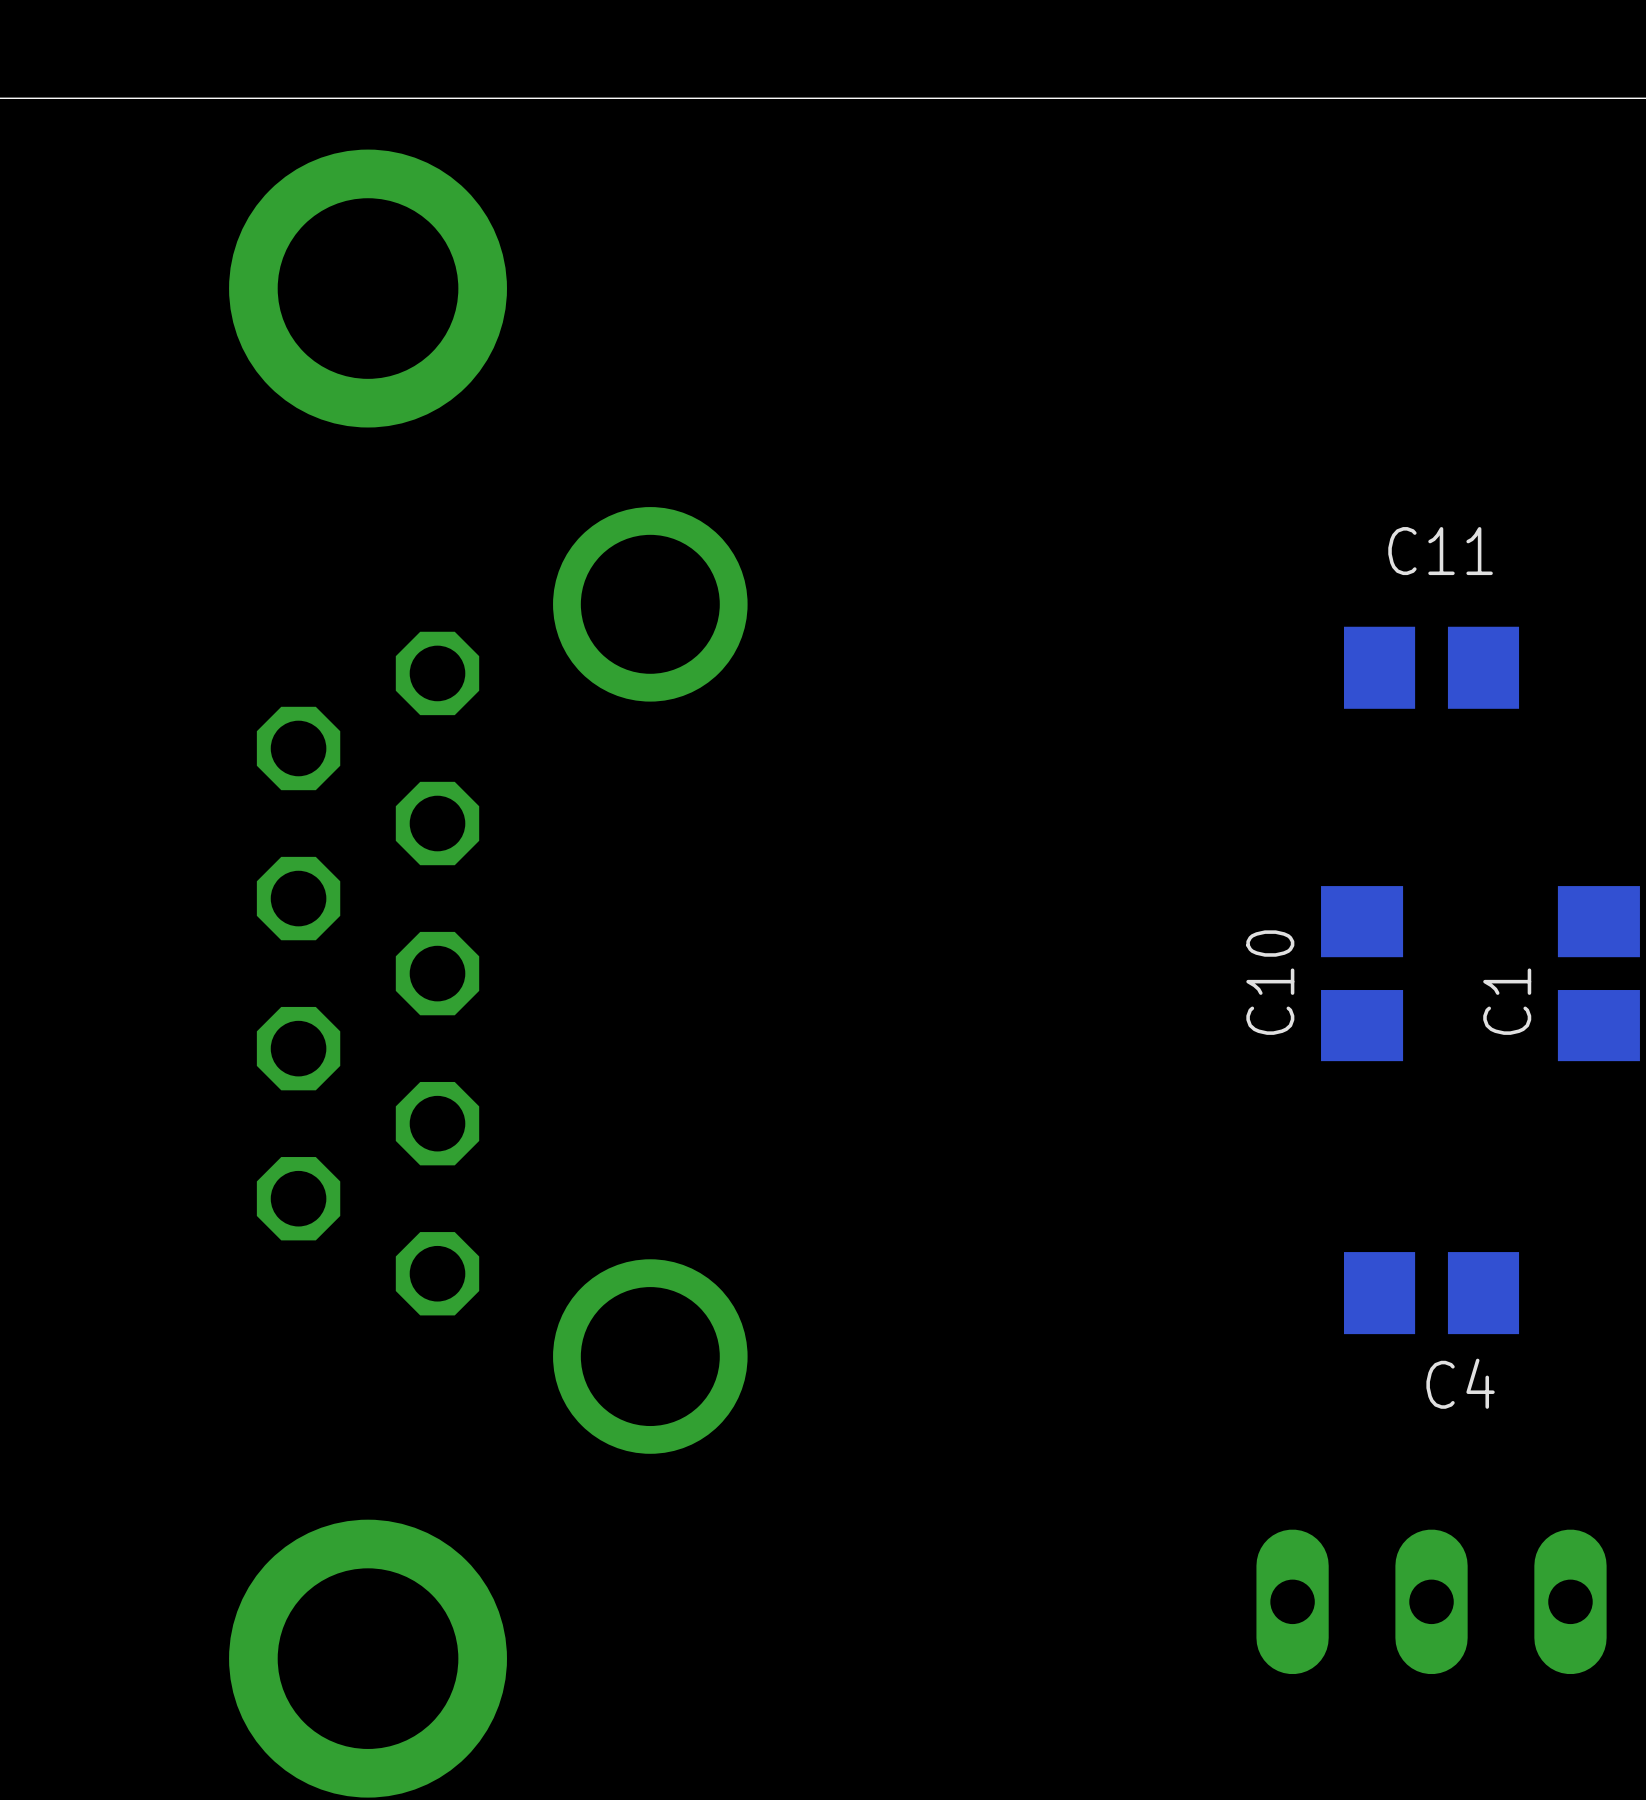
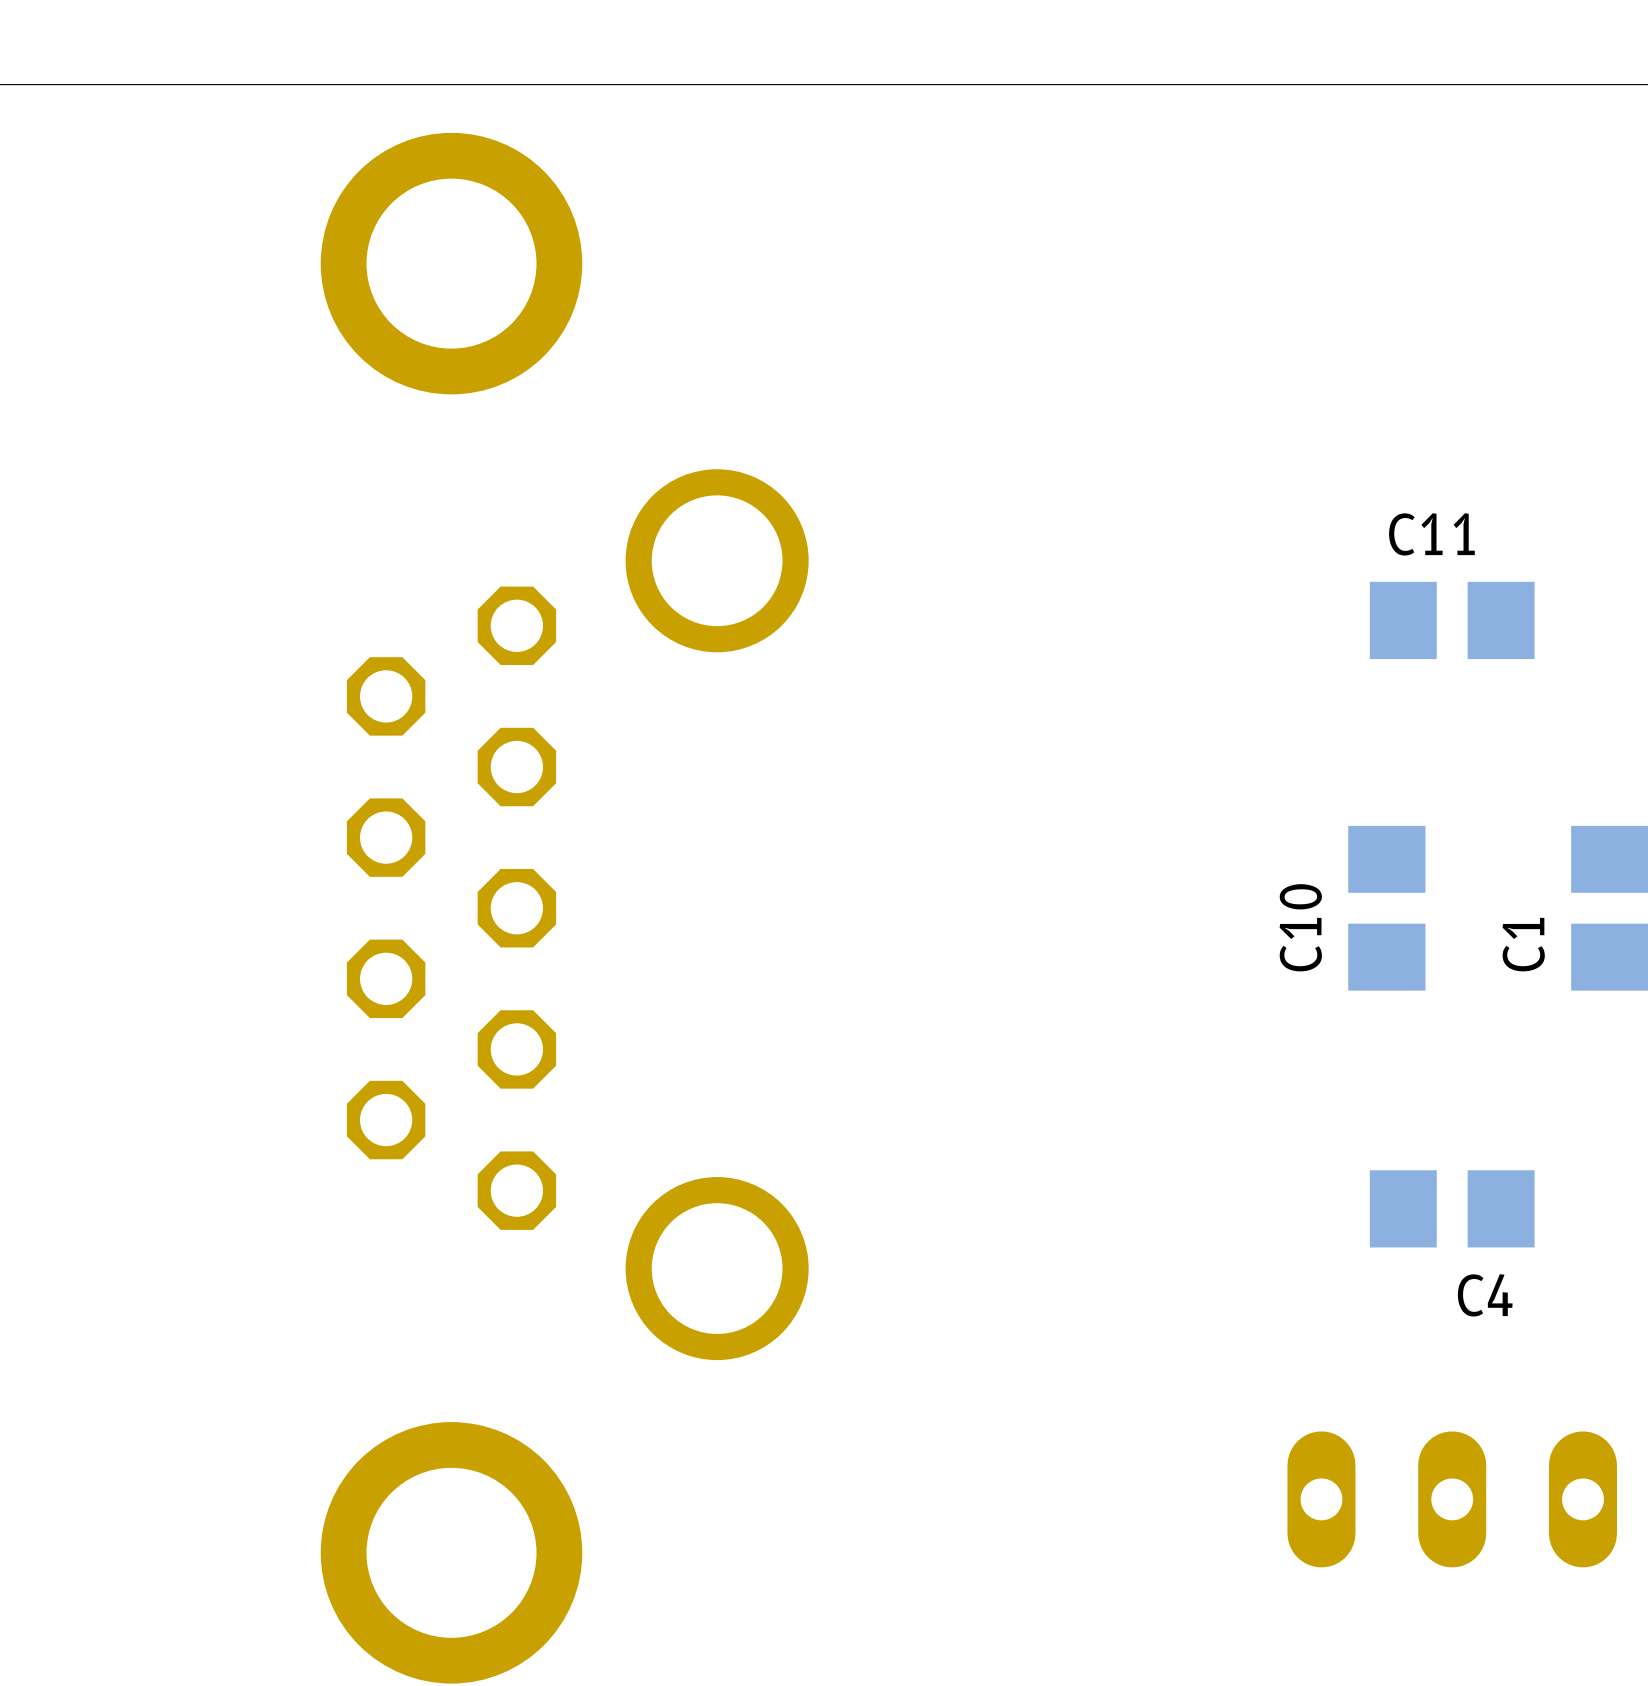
C11 name position: C11 (1440, 551) -> C11 (1431, 534)

